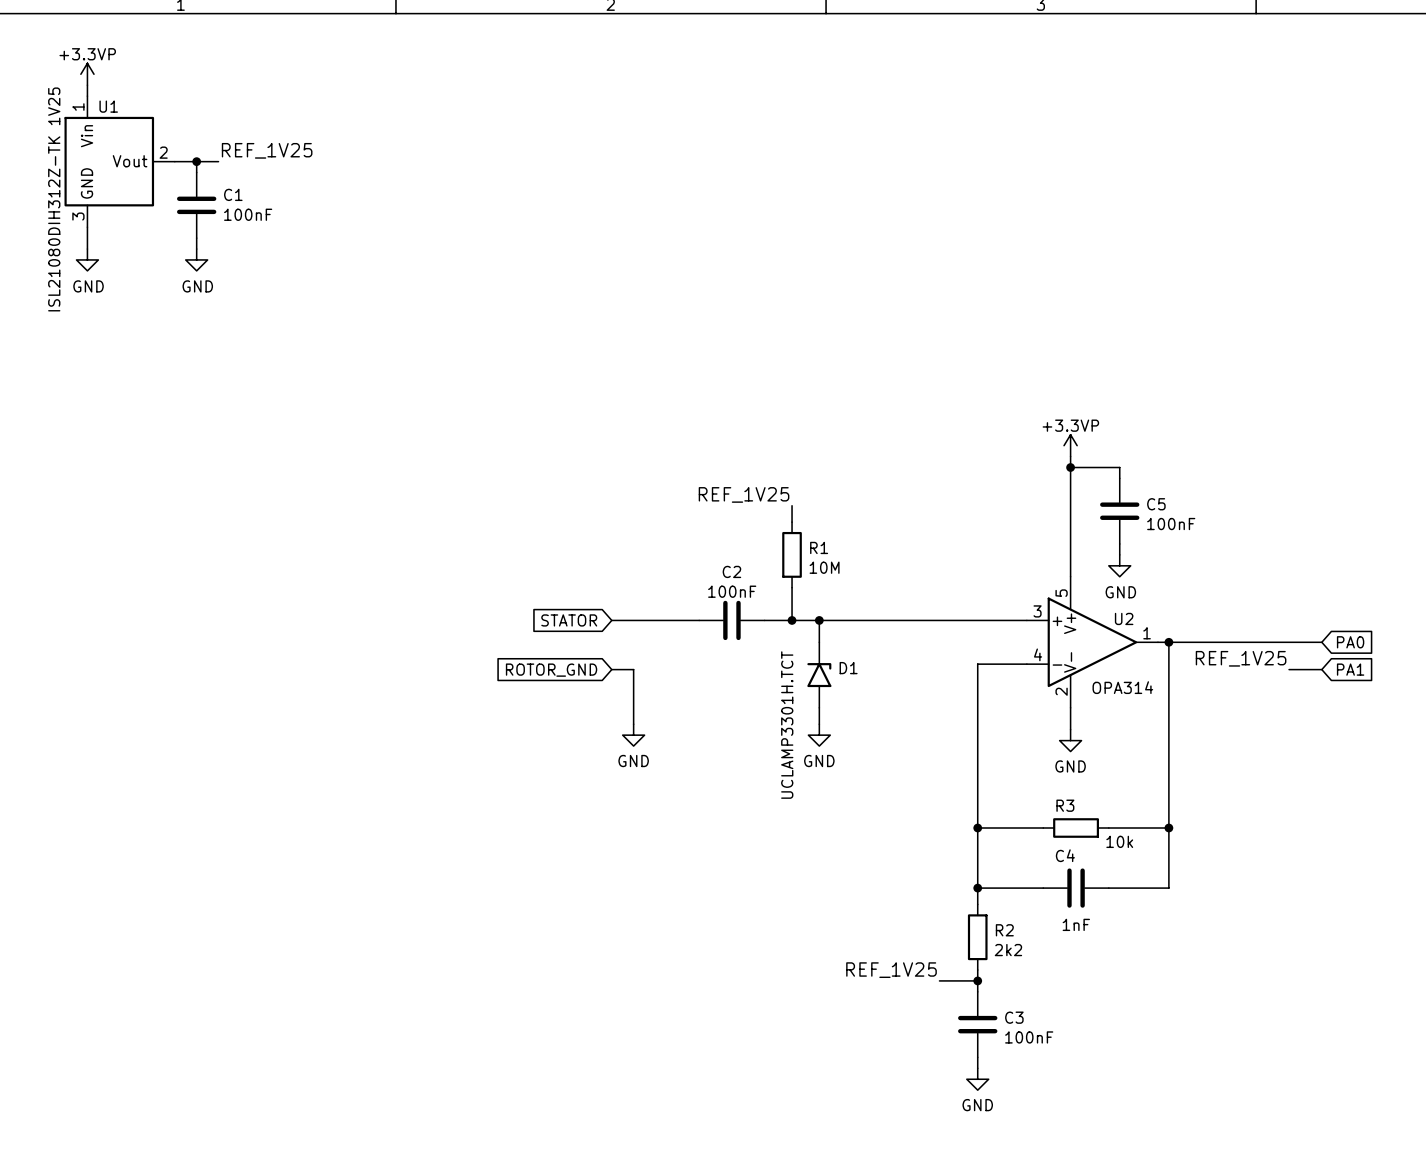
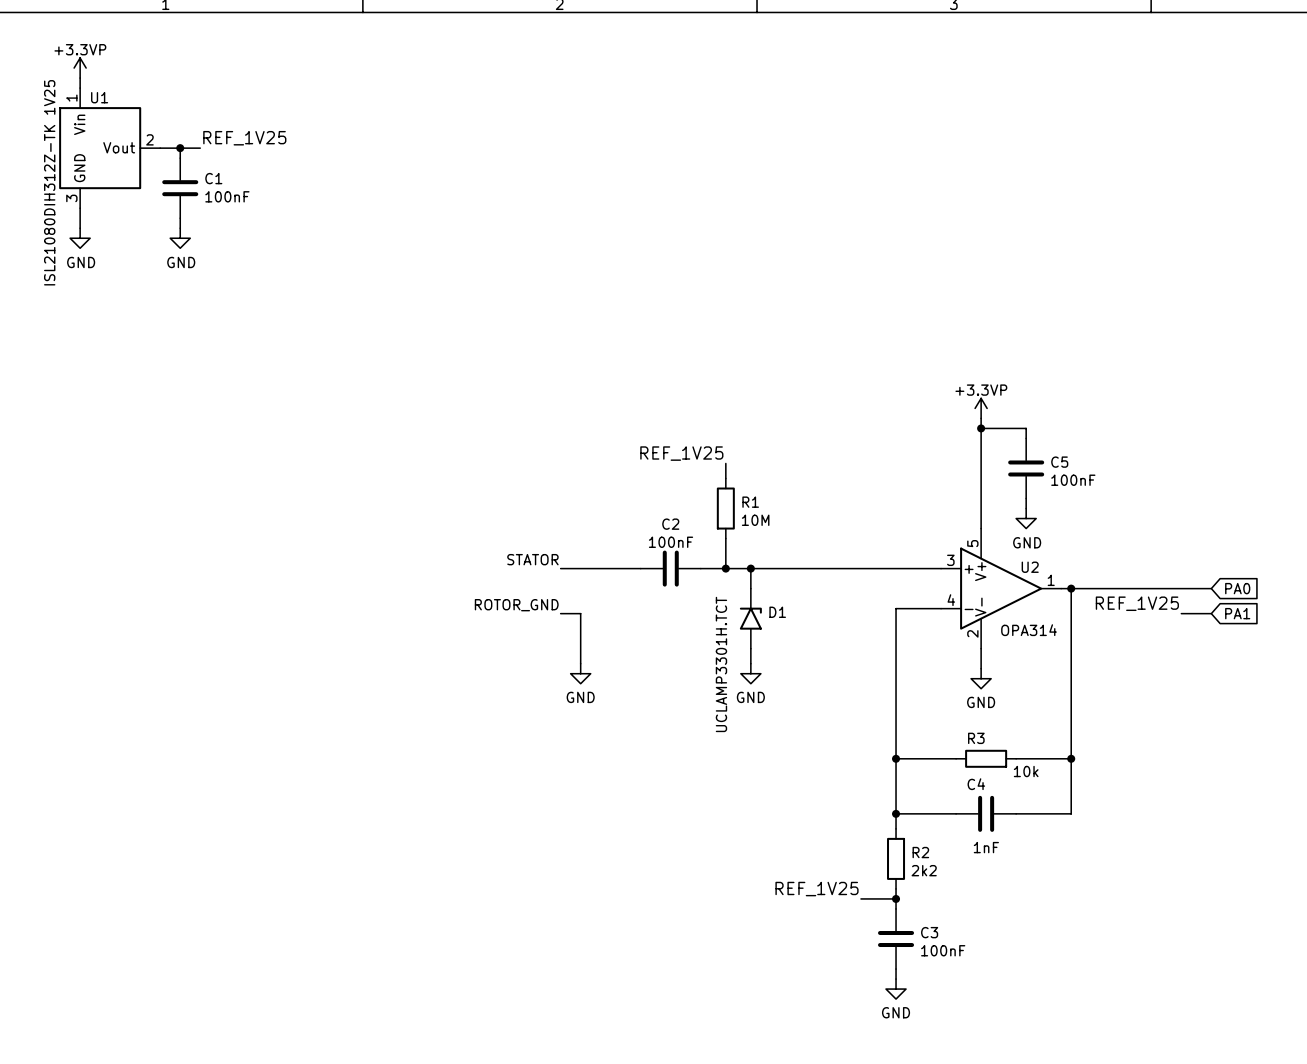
label: none -> STATOR (532, 559)
global label: STATOR (569, 620) -> none
label: none -> ROTOR_GND (516, 605)
global label: ROTOR_GND (551, 670) -> none

